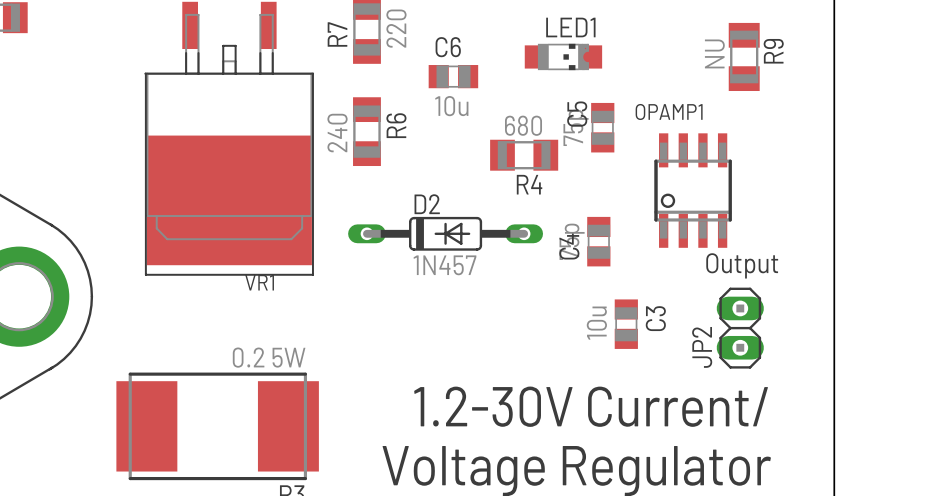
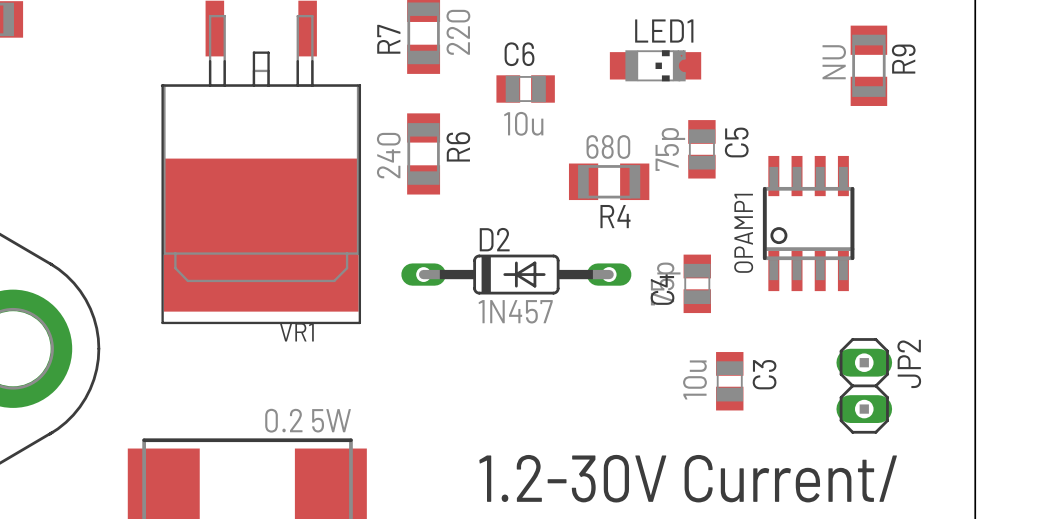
OPAMP1 name rotation: 0° (669, 111) -> 90° counterclockwise (743, 233)
C5 name position: C5 (577, 114) -> C5 (736, 142)
text: Output (742, 265) -> none
JP2 name position: JP2 (702, 347) -> JP2 (909, 363)

